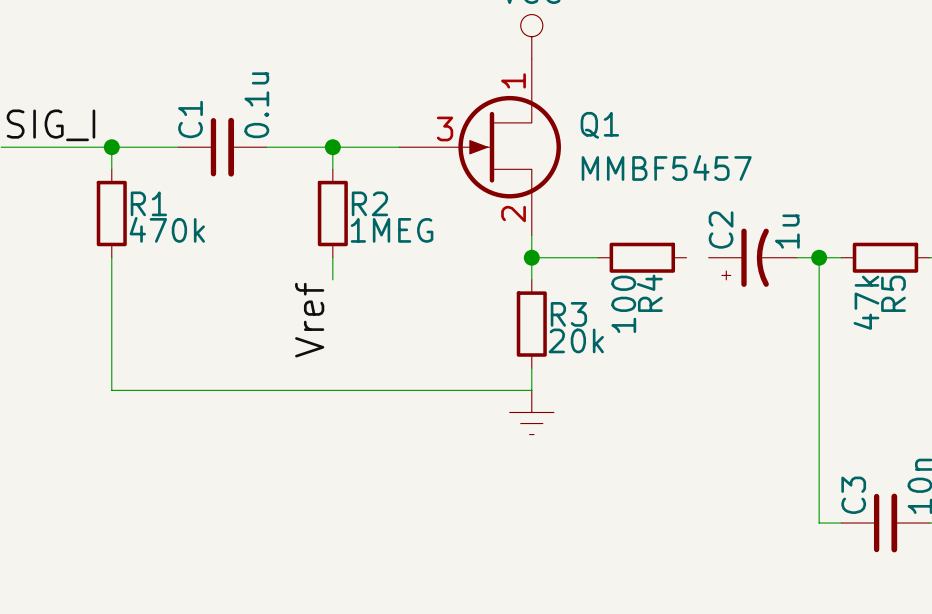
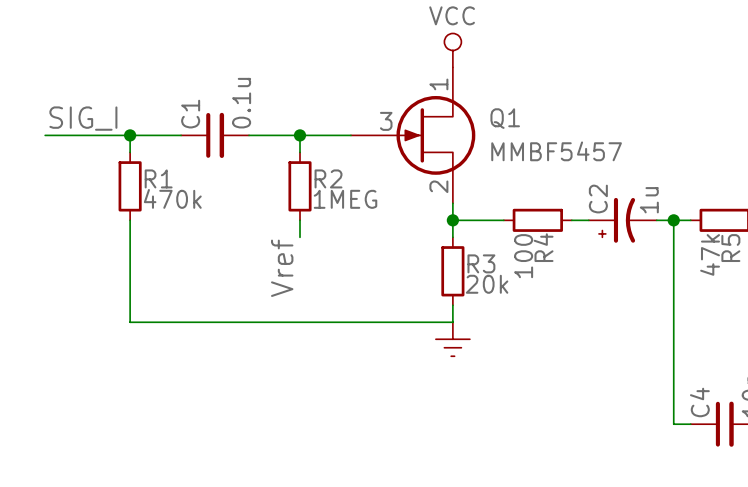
wire: none -> (571, 220) (588, 220)
C3 name: C3 (853, 495) -> C4 (699, 402)

